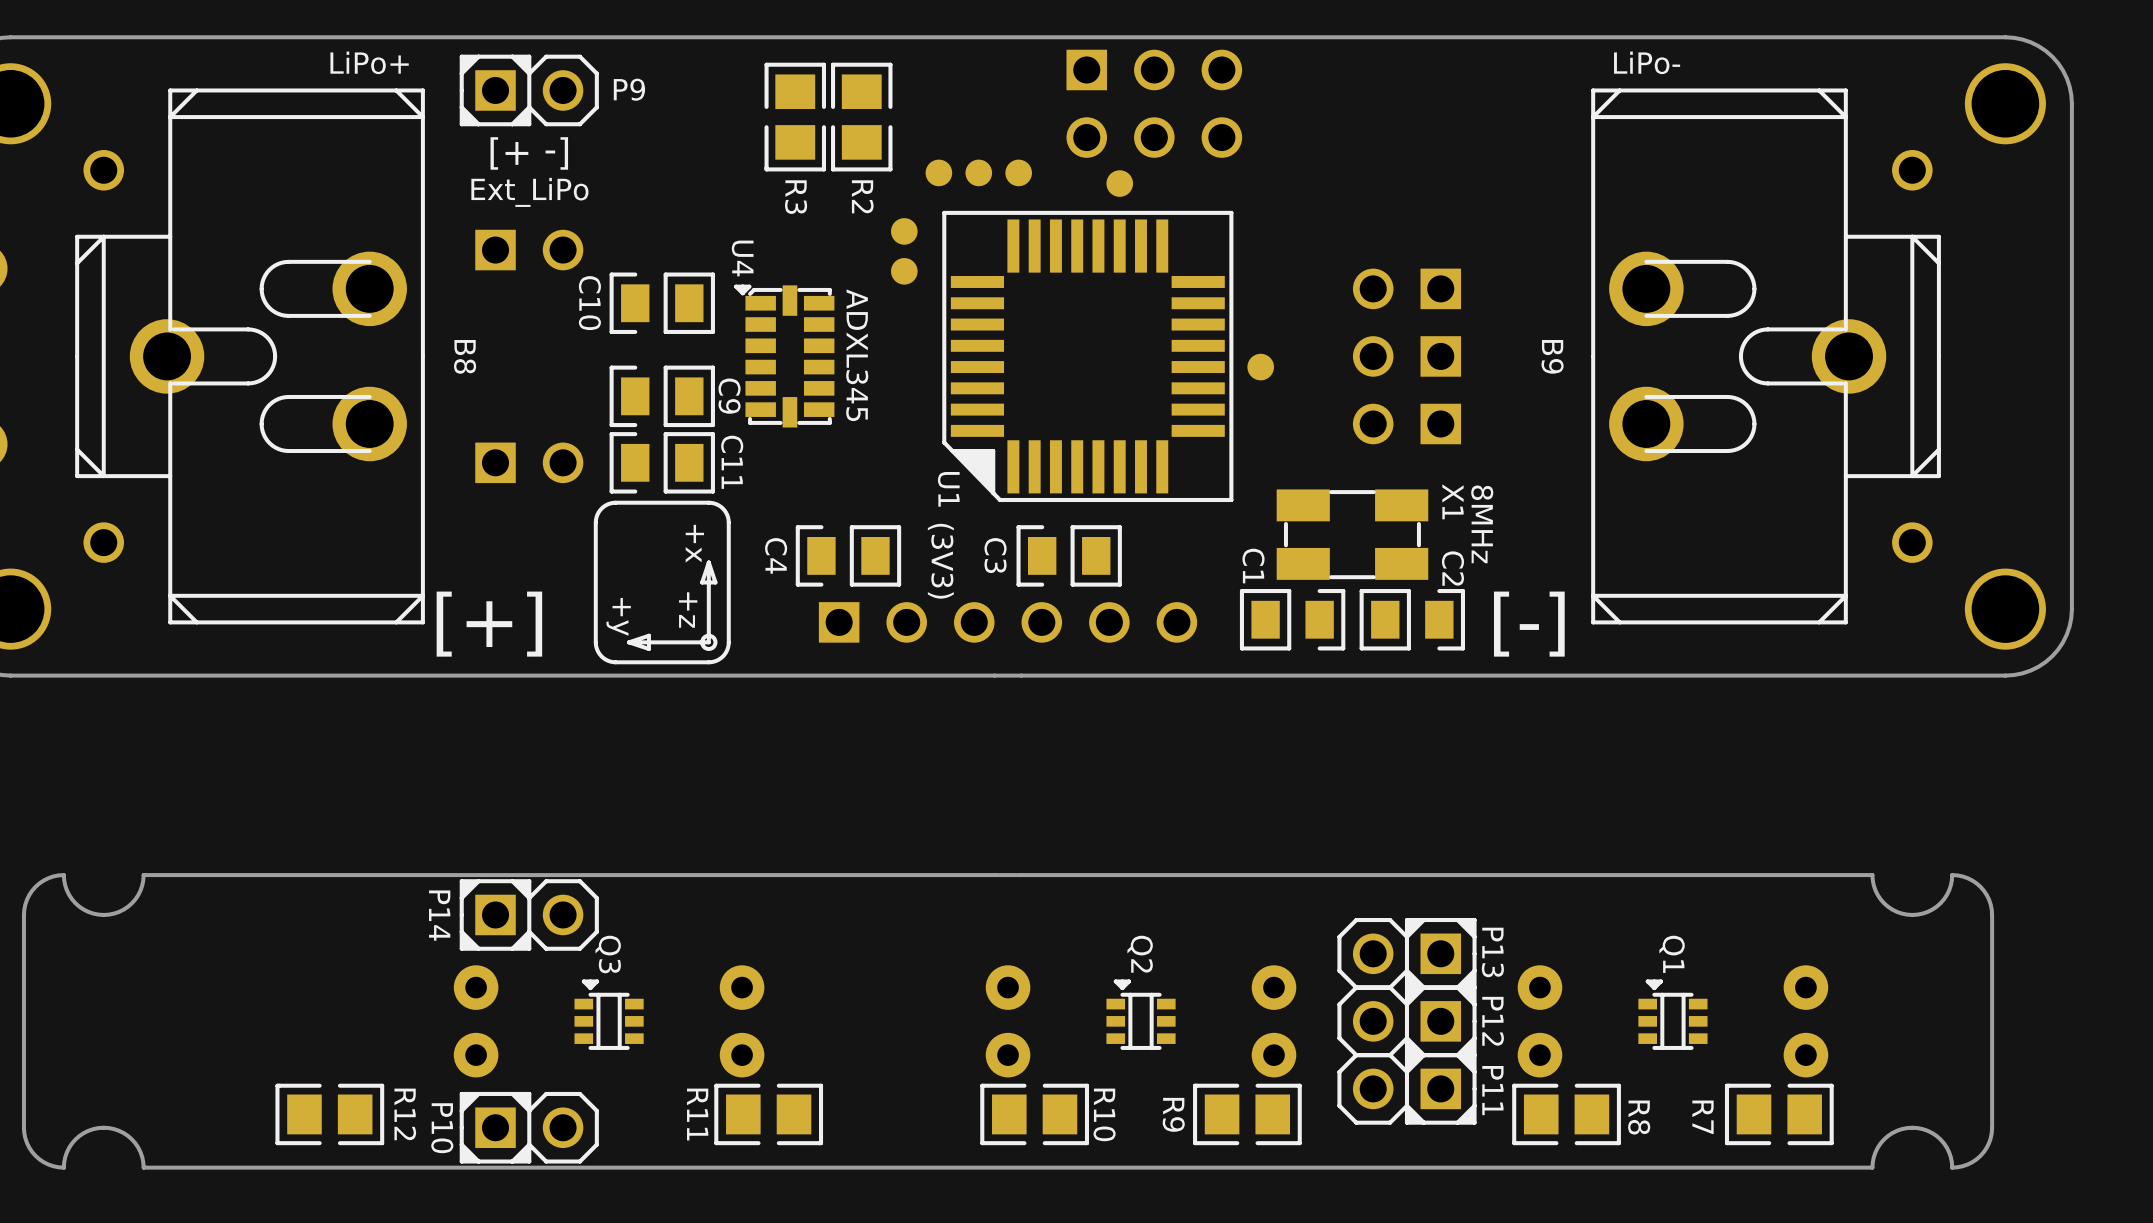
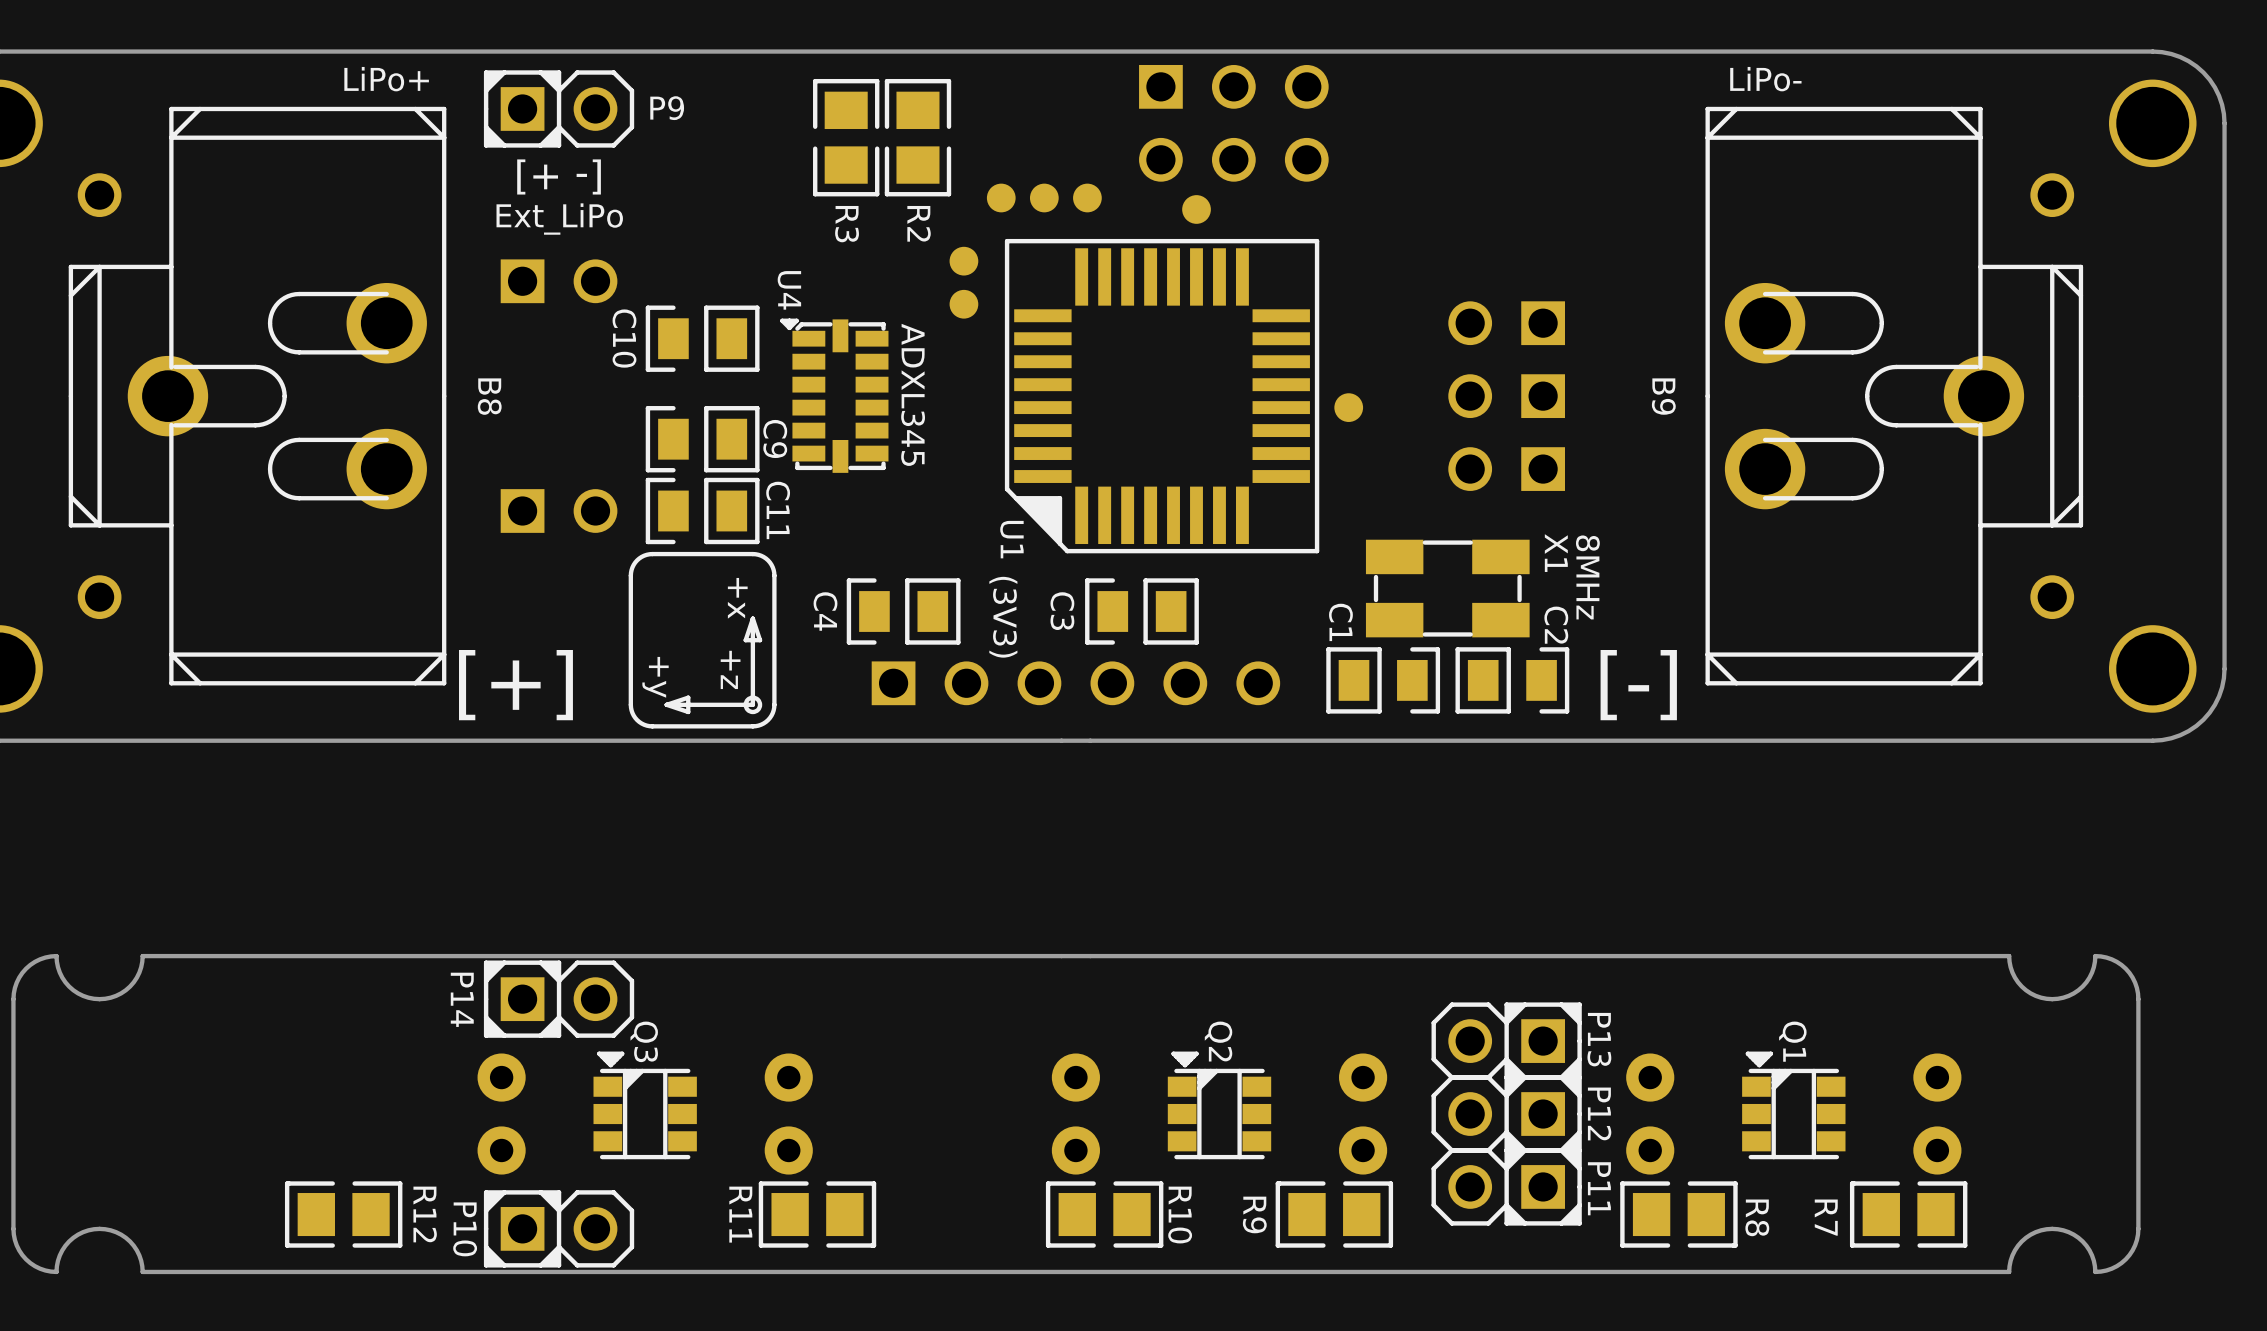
Q3 footprint: [574, 979, 644, 1050] -> [593, 1051, 697, 1160]
Q2 footprint: [1106, 979, 1176, 1050] -> [1167, 1051, 1272, 1160]
Q1 footprint: [1638, 979, 1708, 1050] -> [1742, 1051, 1846, 1160]

